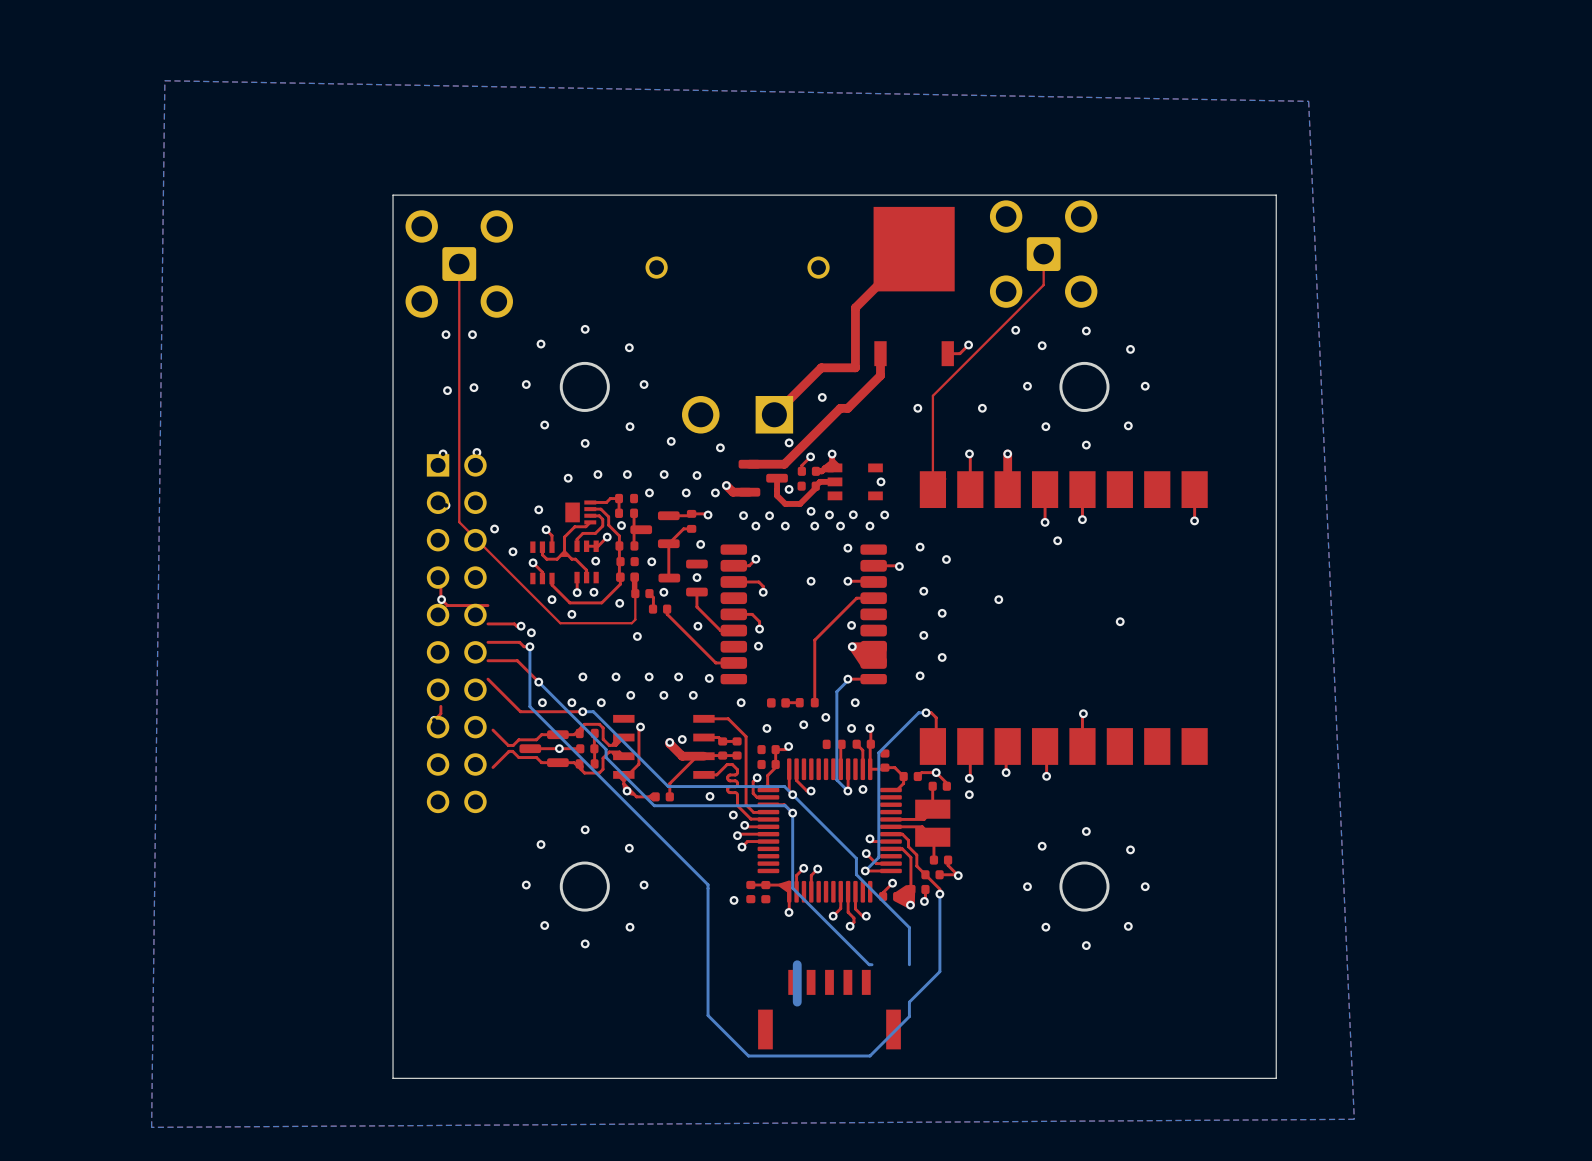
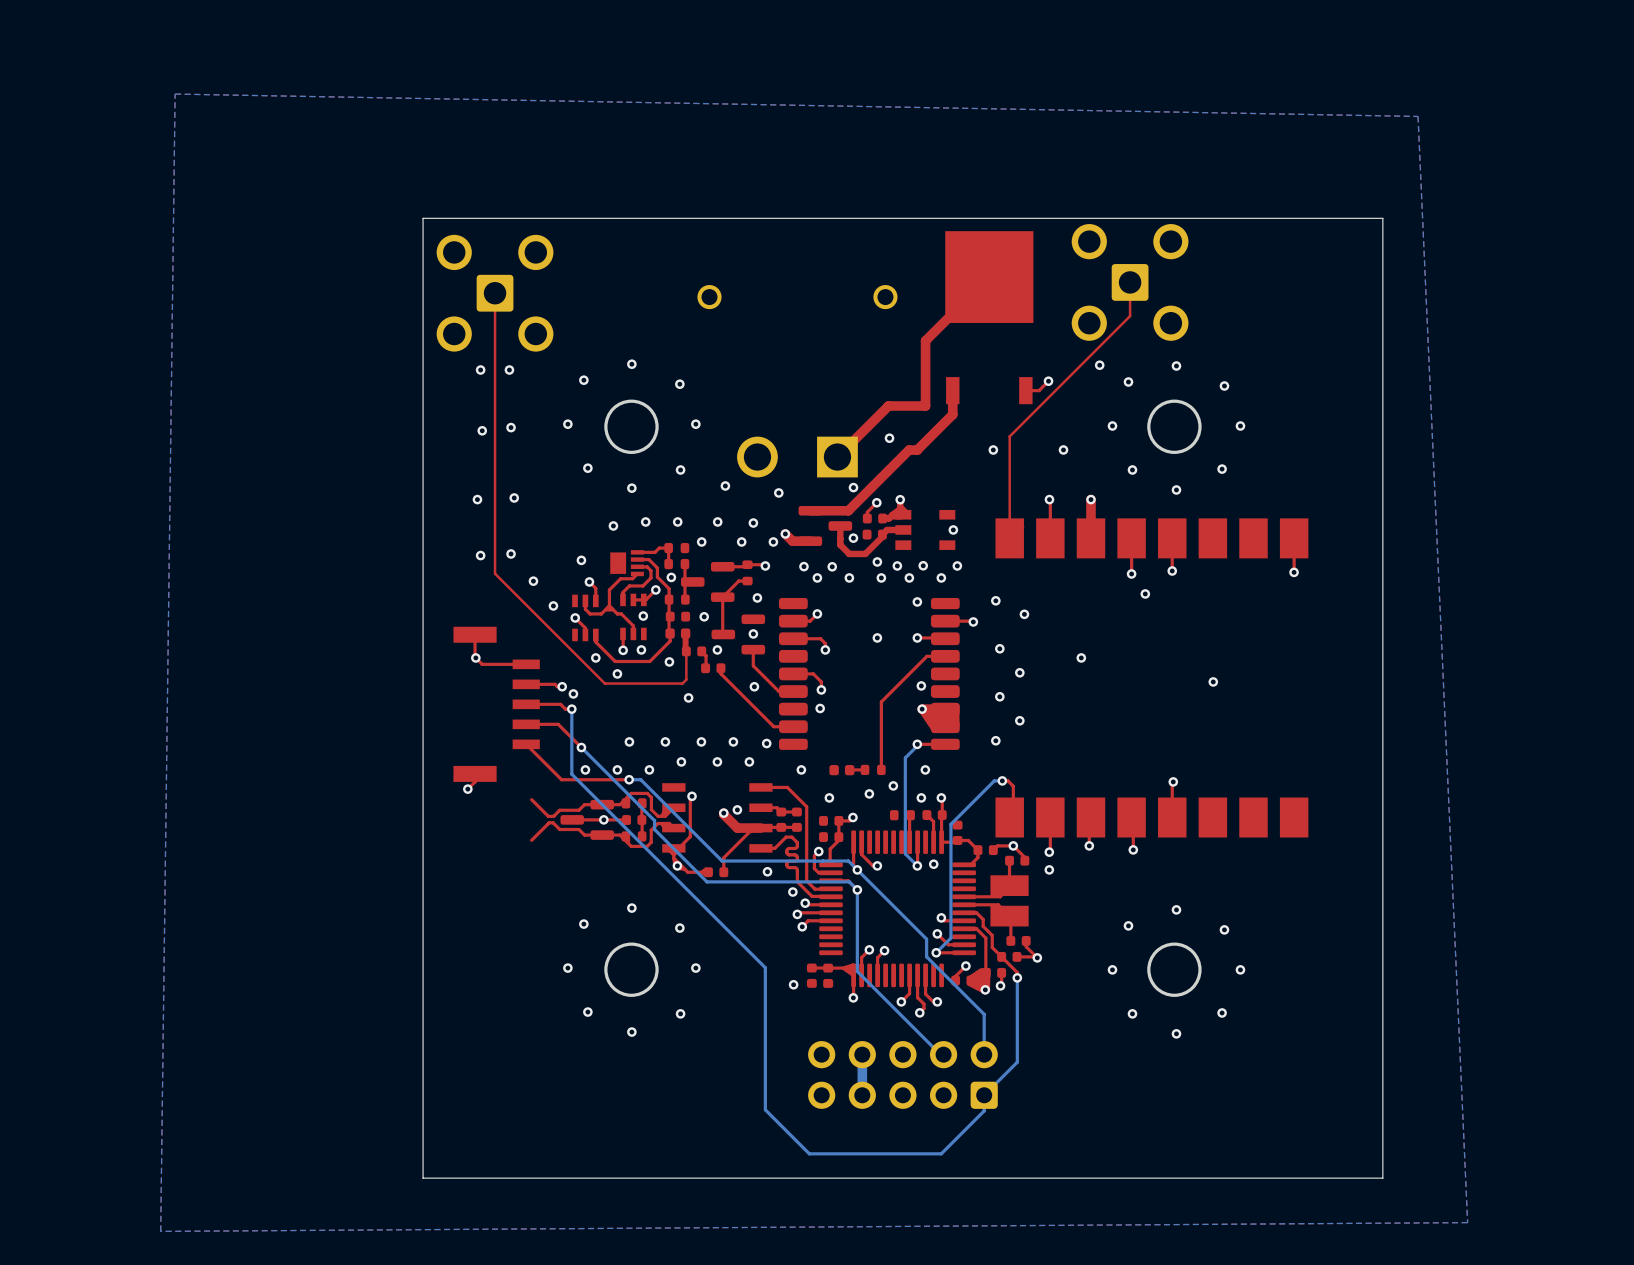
part footprint: [426, 454, 487, 814] -> [453, 626, 540, 782]
part: none -> (902, 1074)
part: (829, 1009) -> none

